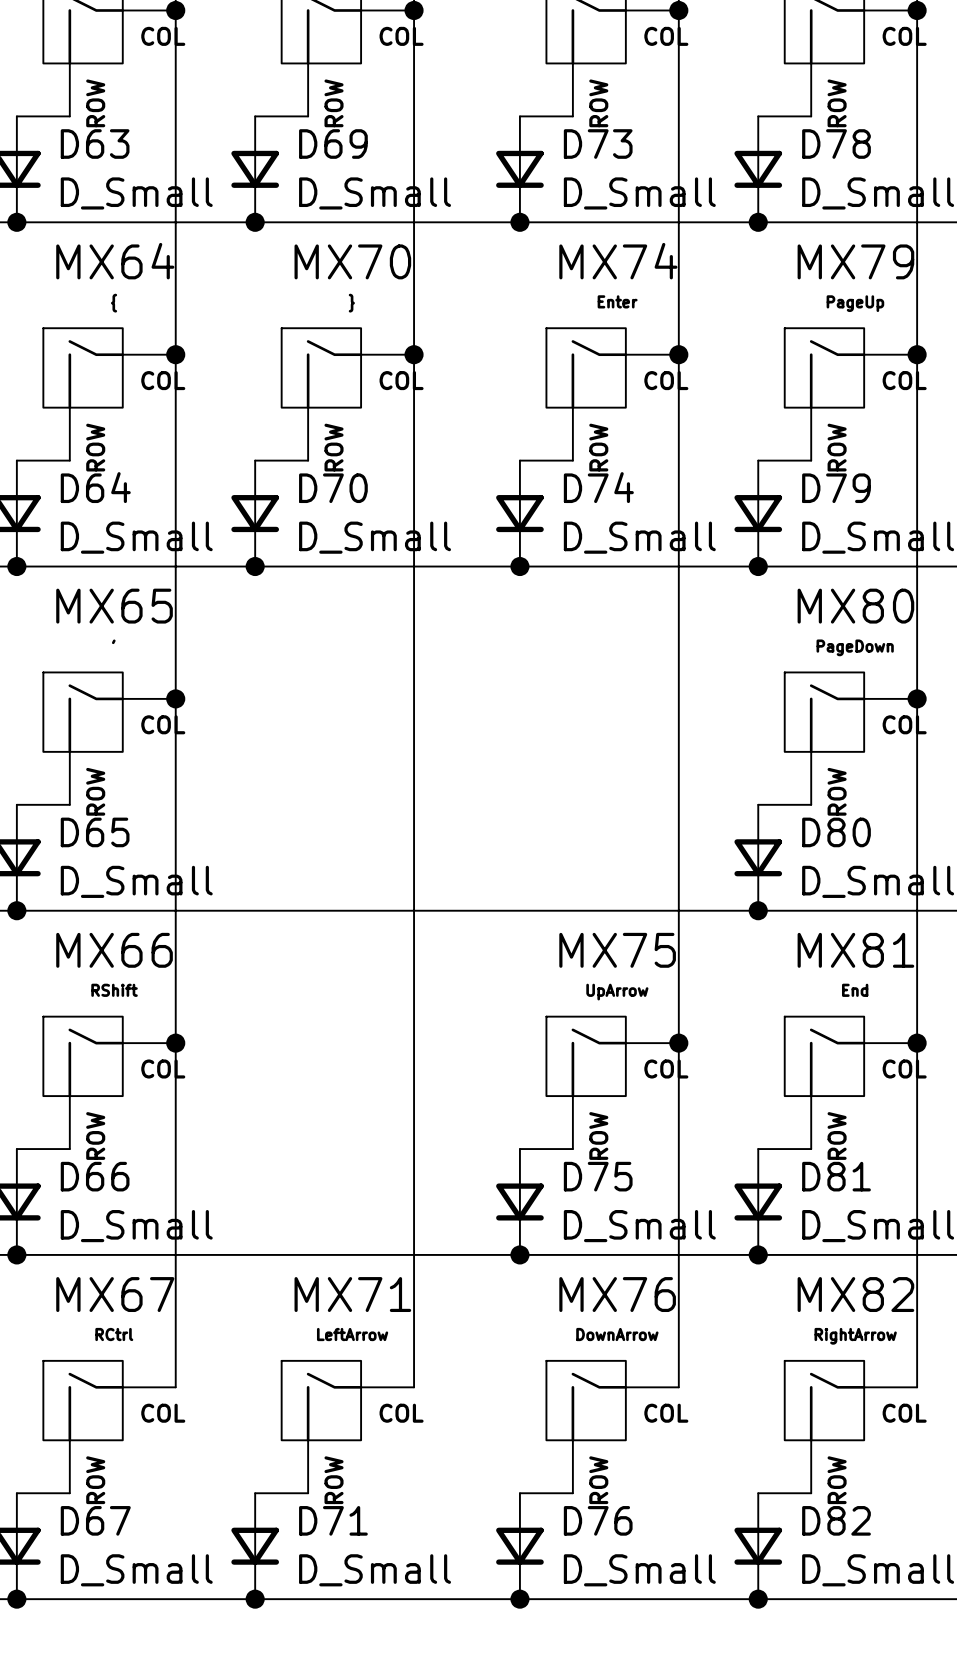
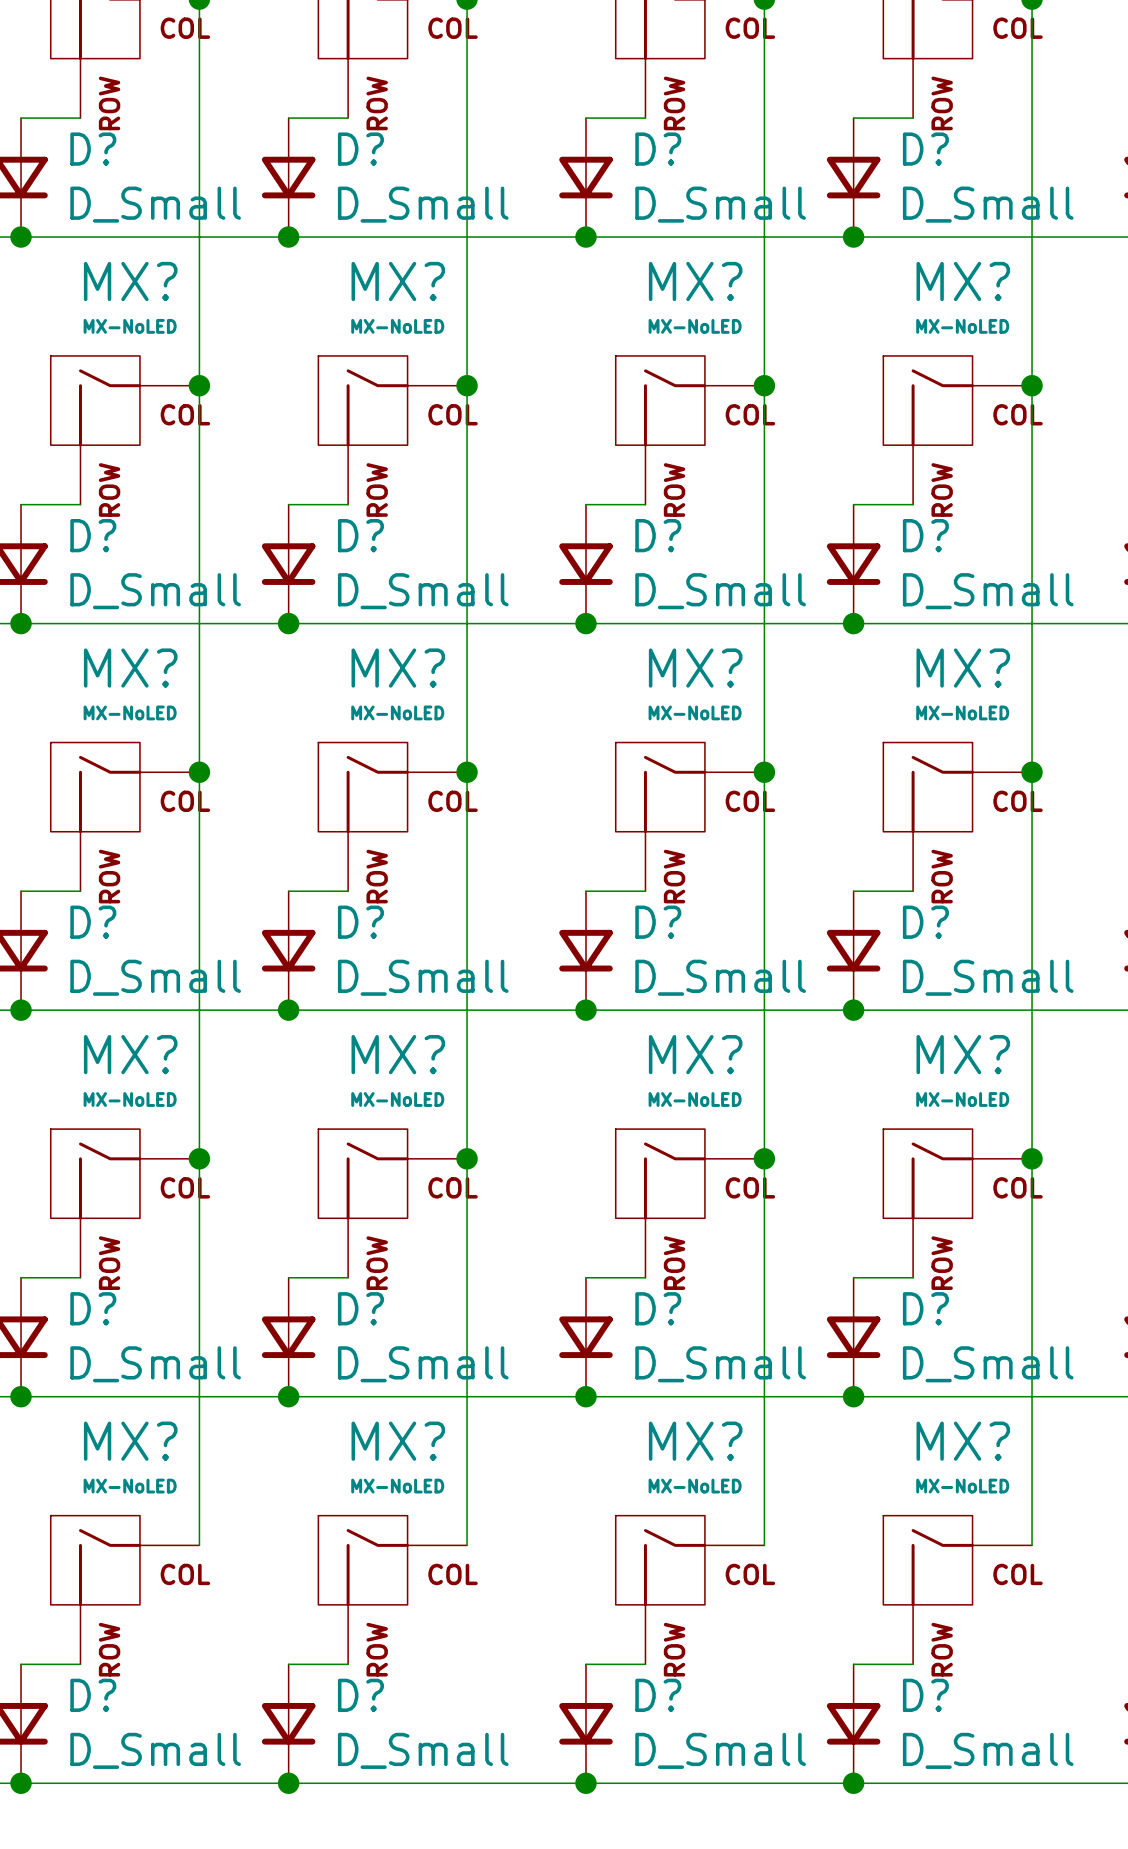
D63 name: D63 (95, 144) -> D? (93, 149)
D69 name: D69 (333, 144) -> D? (360, 149)
D73 name: D73 (598, 144) -> D? (658, 149)
D78 name: D78 (836, 144) -> D? (925, 149)
MX64 name: MX64 (115, 261) -> MX? (130, 281)
MX70 name: MX70 (352, 261) -> MX? (398, 281)
MX74 name: MX74 (618, 261) -> MX? (695, 281)
MX79 name: MX79 (855, 261) -> MX? (963, 281)
MX74 value: Enter (617, 301) -> MX-NoLED (695, 326)
MX64 value: { (114, 303) -> MX-NoLED (130, 326)
MX70 value: } (351, 303) -> MX-NoLED (397, 326)
MX79 value: PageUp (855, 303) -> MX-NoLED (962, 326)
D64 name: D64 (95, 487) -> D? (93, 535)
D74 name: D74 (598, 487) -> D? (658, 535)
D70 name: D70 (333, 488) -> D? (360, 535)
D79 name: D79 (836, 488) -> D? (925, 535)
MX65 name: MX65 (114, 606) -> MX? (130, 668)
MX80 name: MX80 (855, 606) -> MX? (963, 668)
MX65 value: ' (113, 641) -> MX-NoLED (130, 712)
MX80 value: PageDown (855, 647) -> MX-NoLED (962, 712)
junction: none -> (467, 772)
junction: none -> (764, 772)
MX?: none -> MX-NoLED (392, 816)
MX?: none -> MX-NoLED (690, 816)
wire: none -> (288, 891) (348, 891)
wire: none -> (585, 891) (645, 891)
D65 name: D65 (95, 832) -> D? (93, 922)
D80 name: D80 (836, 832) -> D? (925, 922)
D?: none -> D_Small (288, 950)
D?: none -> D_Small (585, 950)
junction: none -> (288, 1010)
junction: none -> (585, 1010)
MX66 name: MX66 (114, 950) -> MX? (130, 1054)
MX75 name: MX75 (617, 950) -> MX? (695, 1054)
MX81 name: MX81 (855, 950) -> MX? (963, 1054)
MX66 value: RShift (114, 990) -> MX-NoLED (130, 1099)
MX81 value: End (855, 990) -> MX-NoLED (962, 1099)
MX75 value: UpArrow (617, 992) -> MX-NoLED (695, 1099)
junction: none -> (467, 1158)
MX?: none -> MX-NoLED (392, 1203)
wire: none -> (288, 1277) (348, 1277)
D66 name: D66 (95, 1176) -> D? (93, 1308)
D75 name: D75 (598, 1176) -> D? (658, 1308)
D81 name: D81 (836, 1176) -> D? (925, 1308)
D?: none -> D_Small (288, 1337)
junction: none -> (288, 1396)
MX67 name: MX67 (115, 1294) -> MX? (130, 1441)
MX71 name: MX71 (352, 1294) -> MX? (398, 1441)
MX76 name: MX76 (617, 1294) -> MX? (695, 1441)
MX82 name: MX82 (855, 1294) -> MX? (963, 1441)
MX67 value: RCtrl (114, 1334) -> MX-NoLED (130, 1486)
MX71 value: LeftArrow (352, 1334) -> MX-NoLED (397, 1486)
MX76 value: DownArrow (617, 1334) -> MX-NoLED (695, 1486)
MX82 value: RightArrow (855, 1336) -> MX-NoLED (962, 1486)
D67 name: D67 (95, 1520) -> D? (93, 1695)
D71 name: D71 (333, 1520) -> D? (360, 1695)
D76 name: D76 (598, 1520) -> D? (658, 1695)
D82 name: D82 (836, 1520) -> D? (925, 1695)

